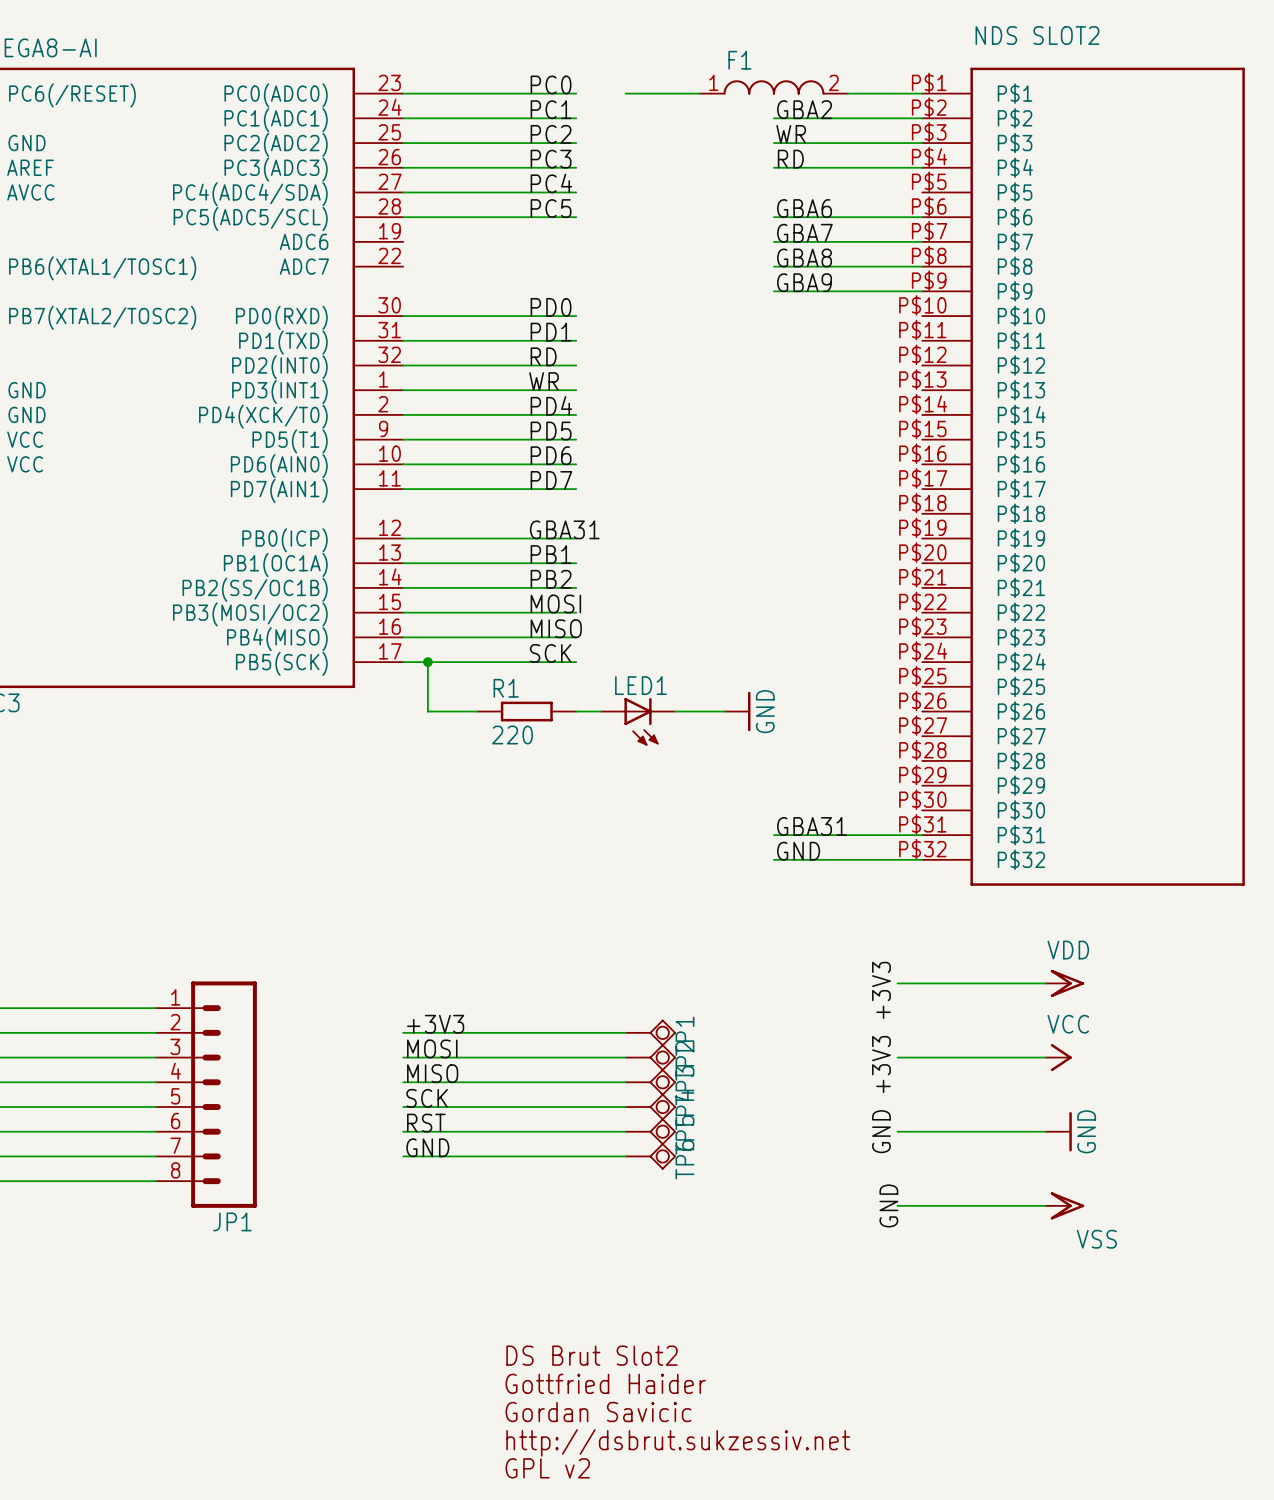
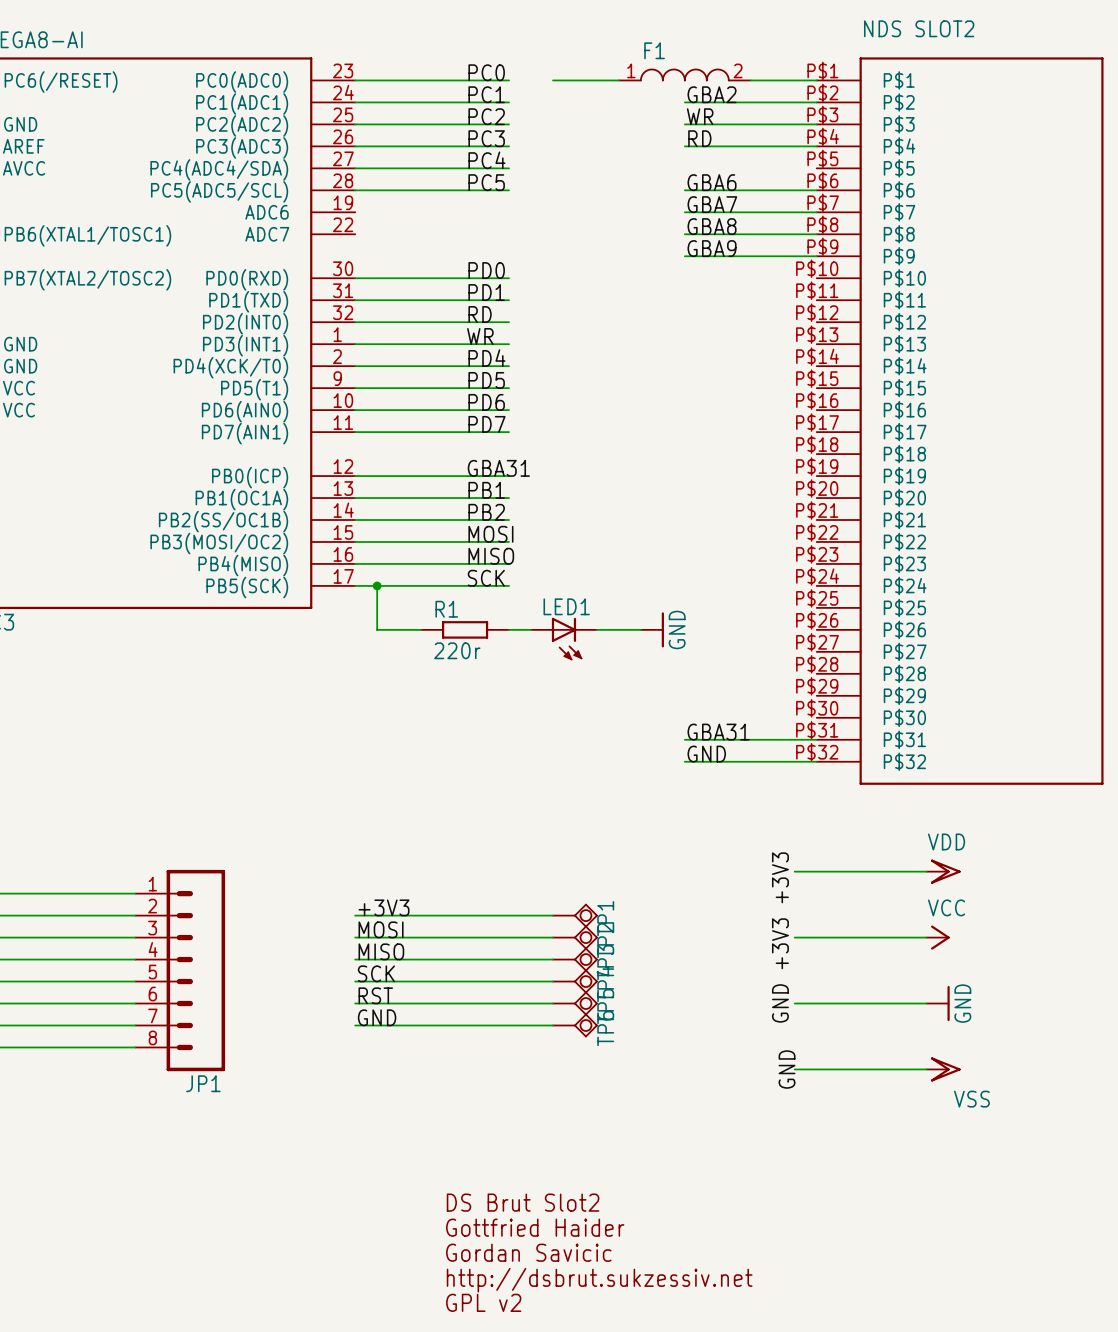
R1 value: 220 (512, 735) -> 220r (457, 650)

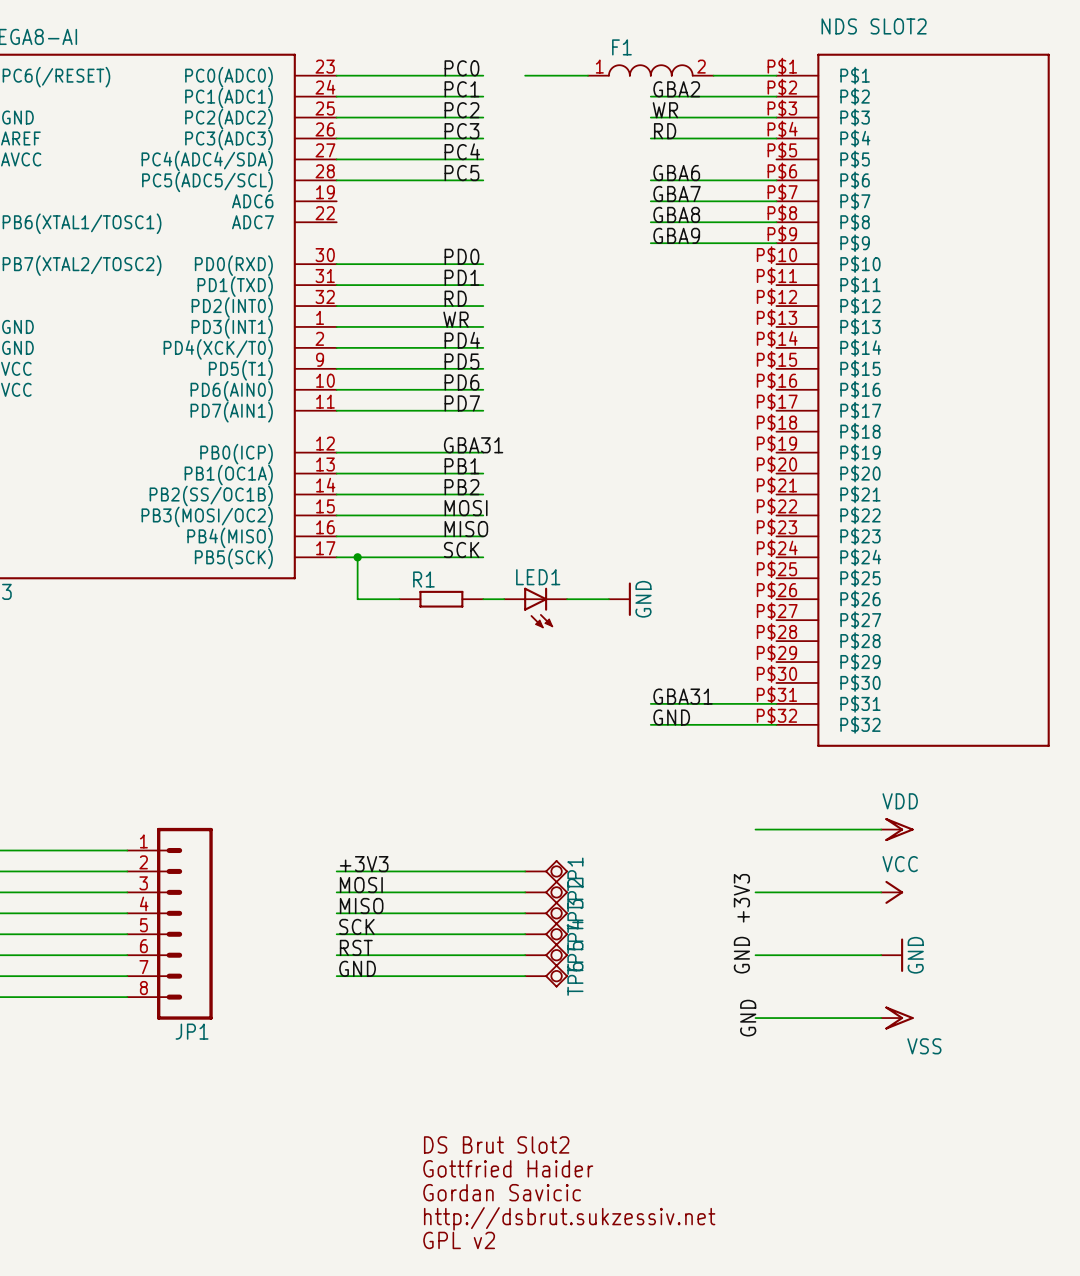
R1 value: 220r (457, 650) -> none
label: +3V3 (780, 877) -> none

